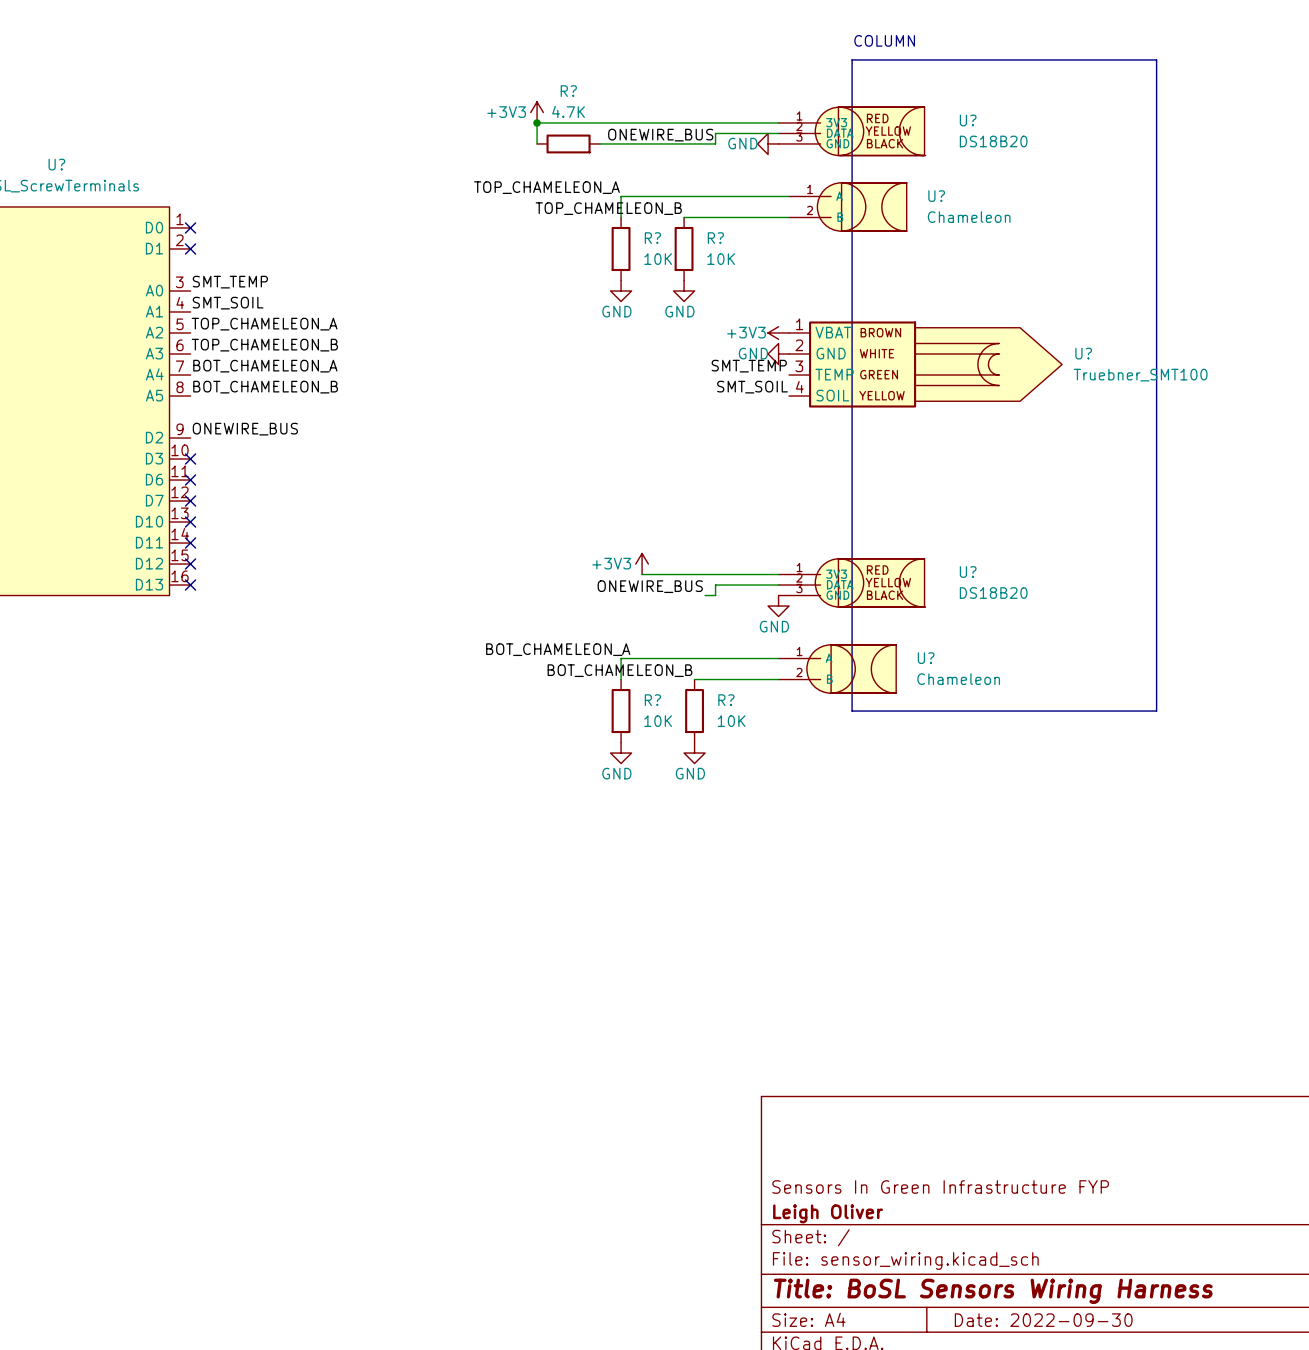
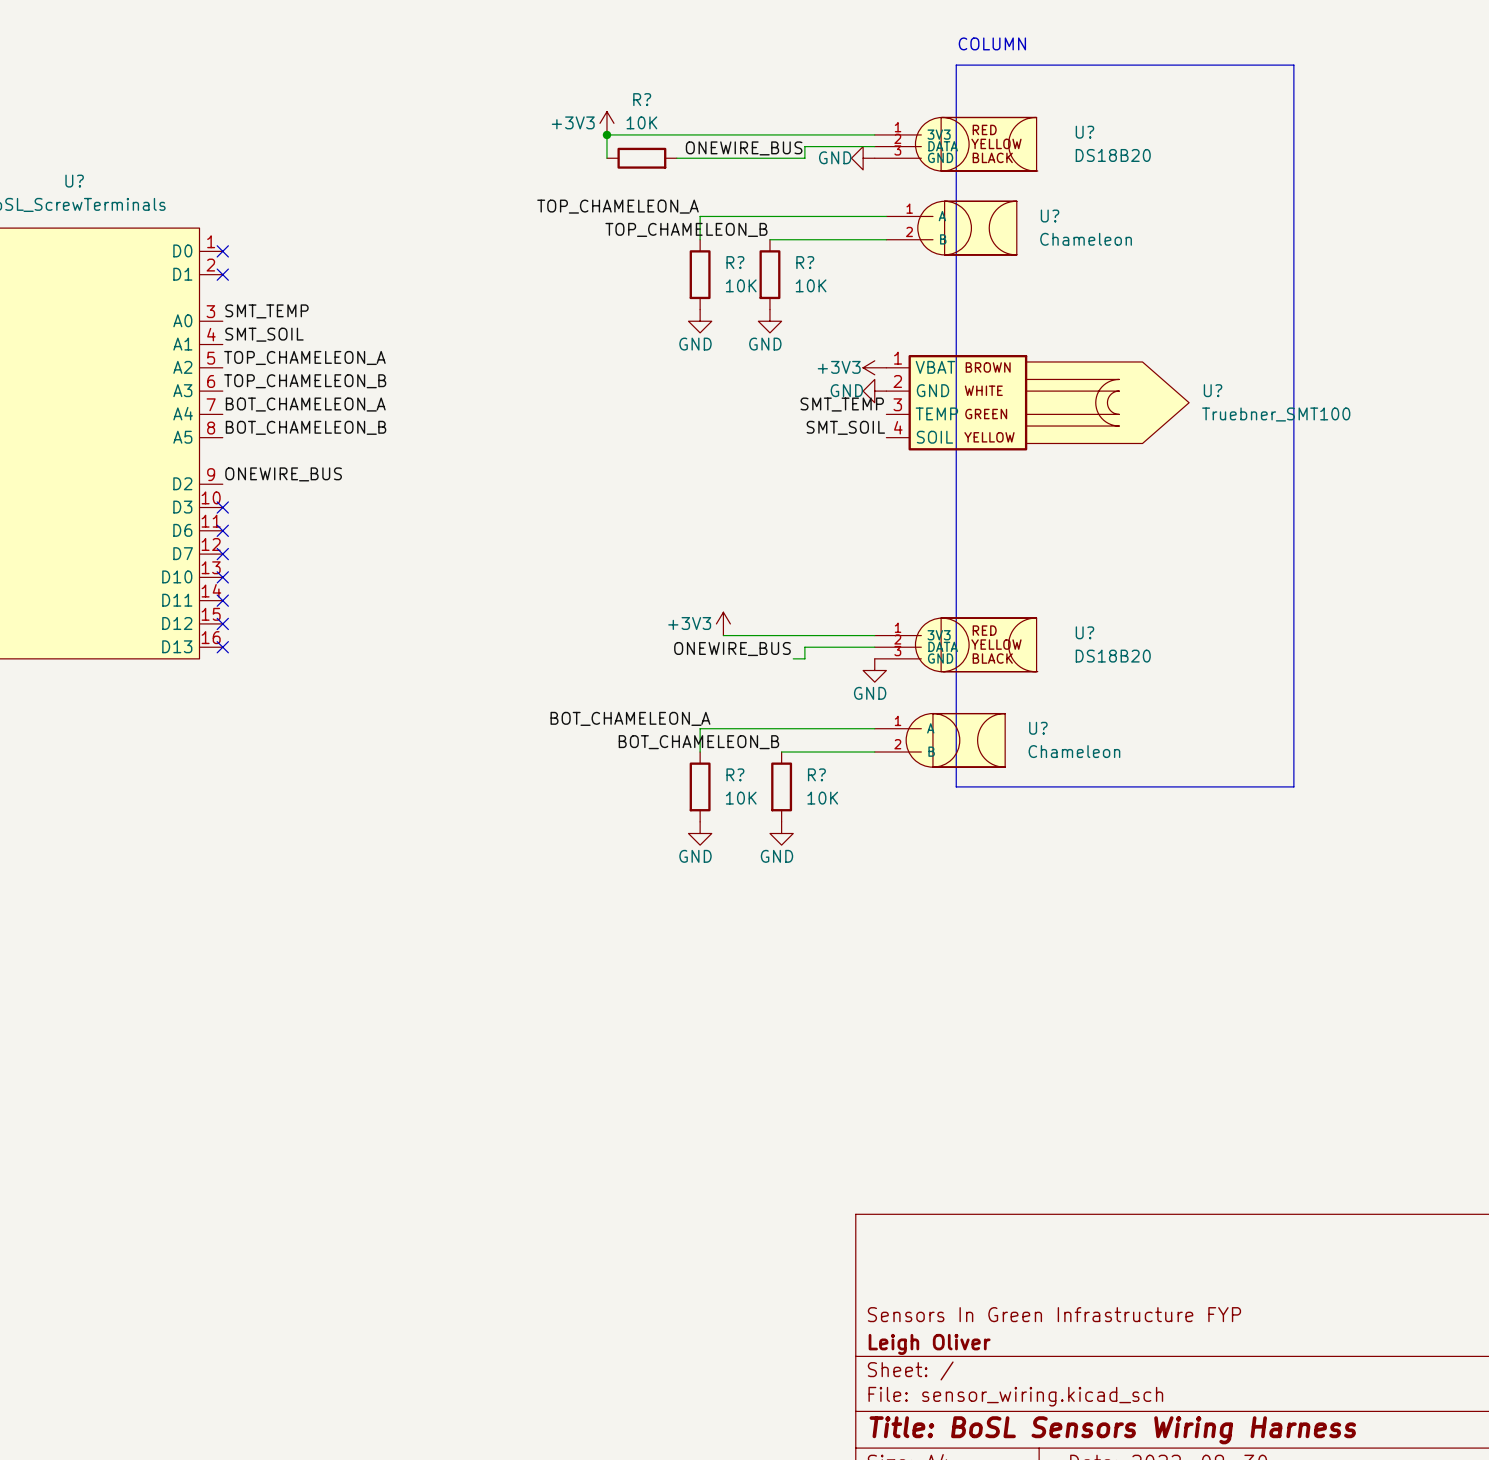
R? value: 4.7K (568, 111) -> 10K (641, 122)

